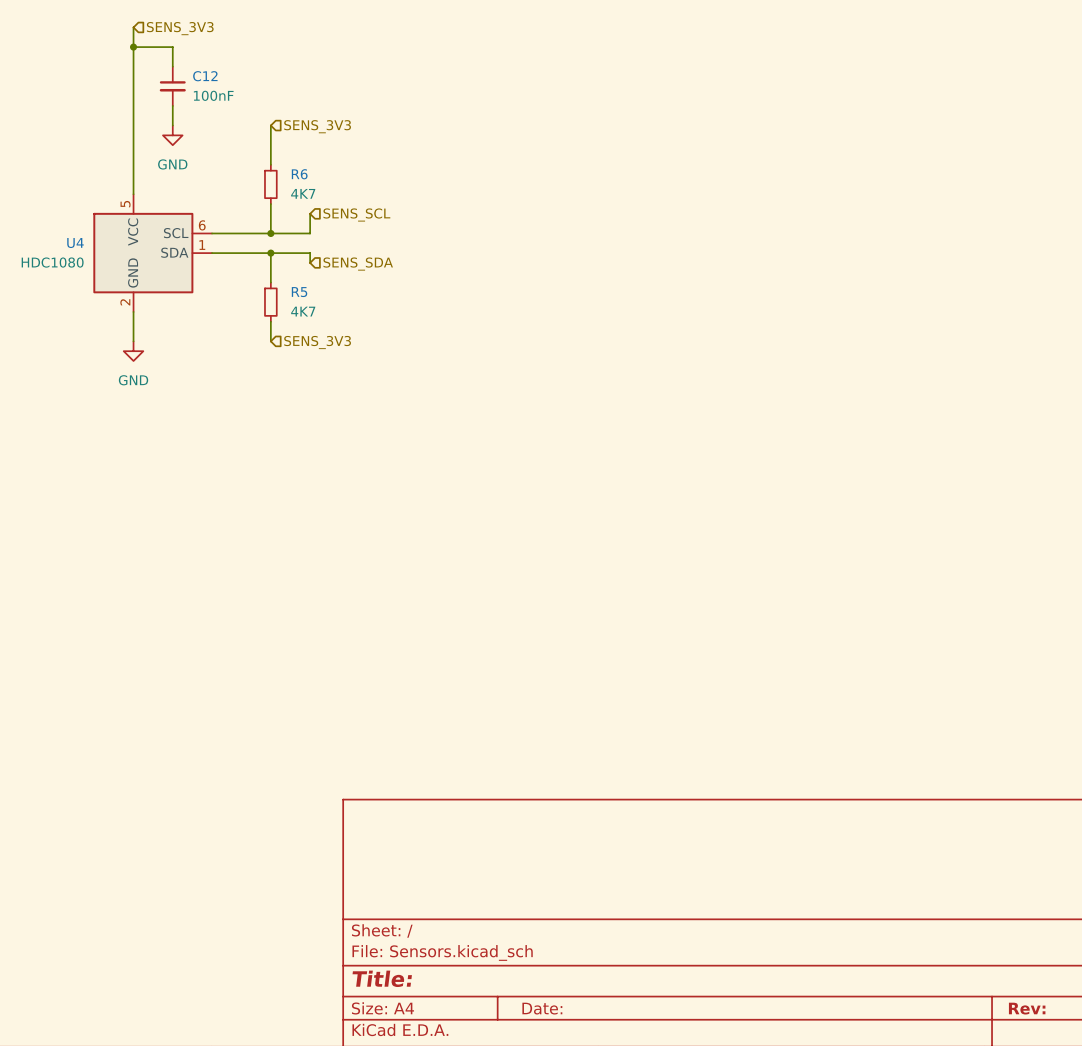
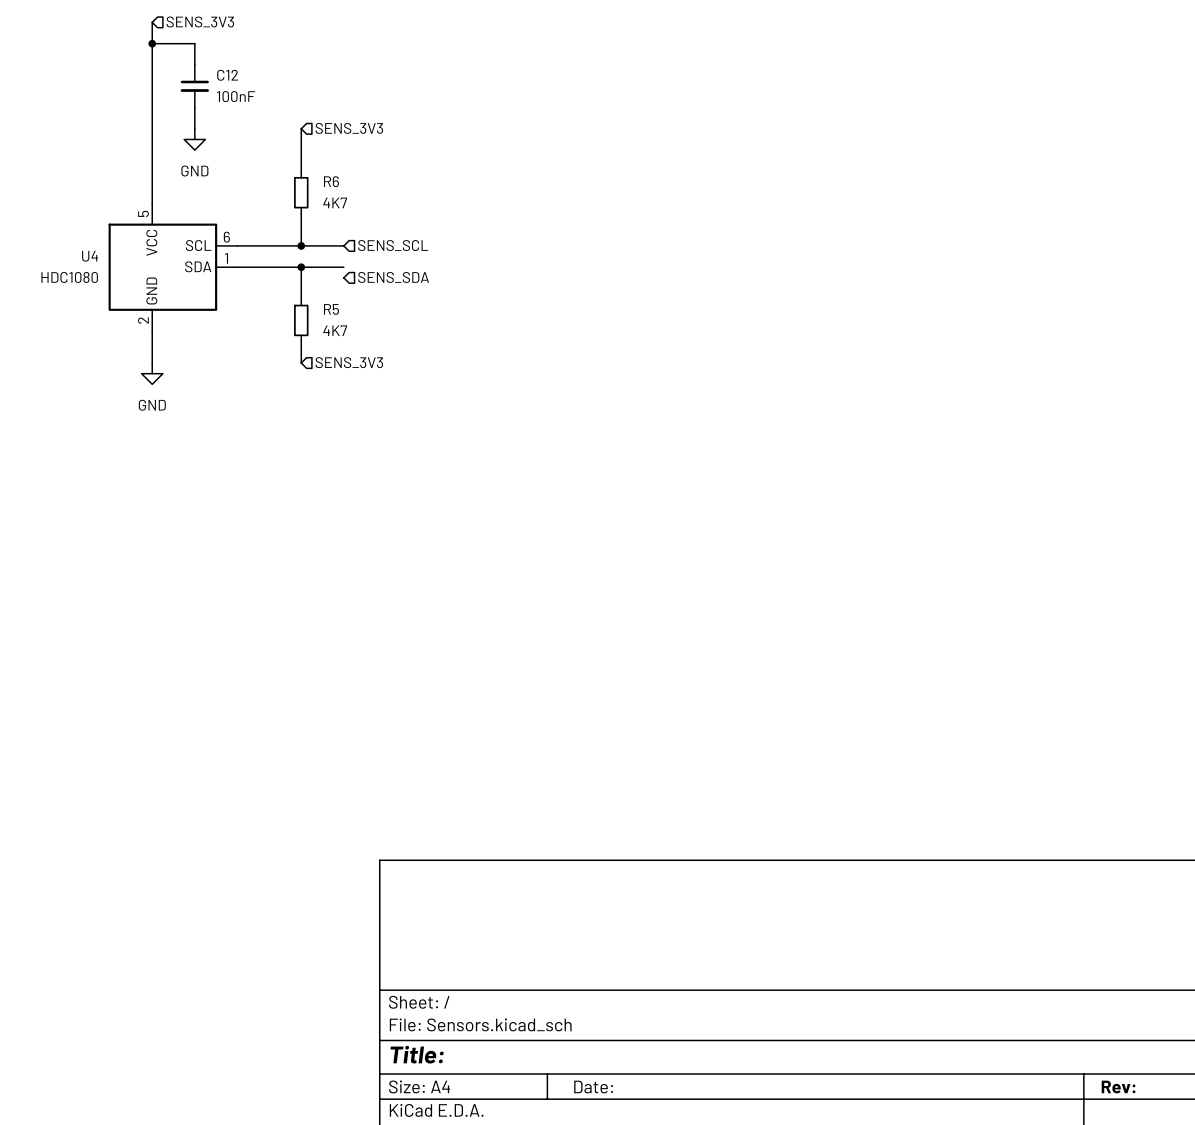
wire: (310, 213) (310, 233) -> none
hierarchical label position: SENS_SCL (356, 214) -> SENS_SCL (393, 245)
wire: (310, 253) (310, 262) -> none

